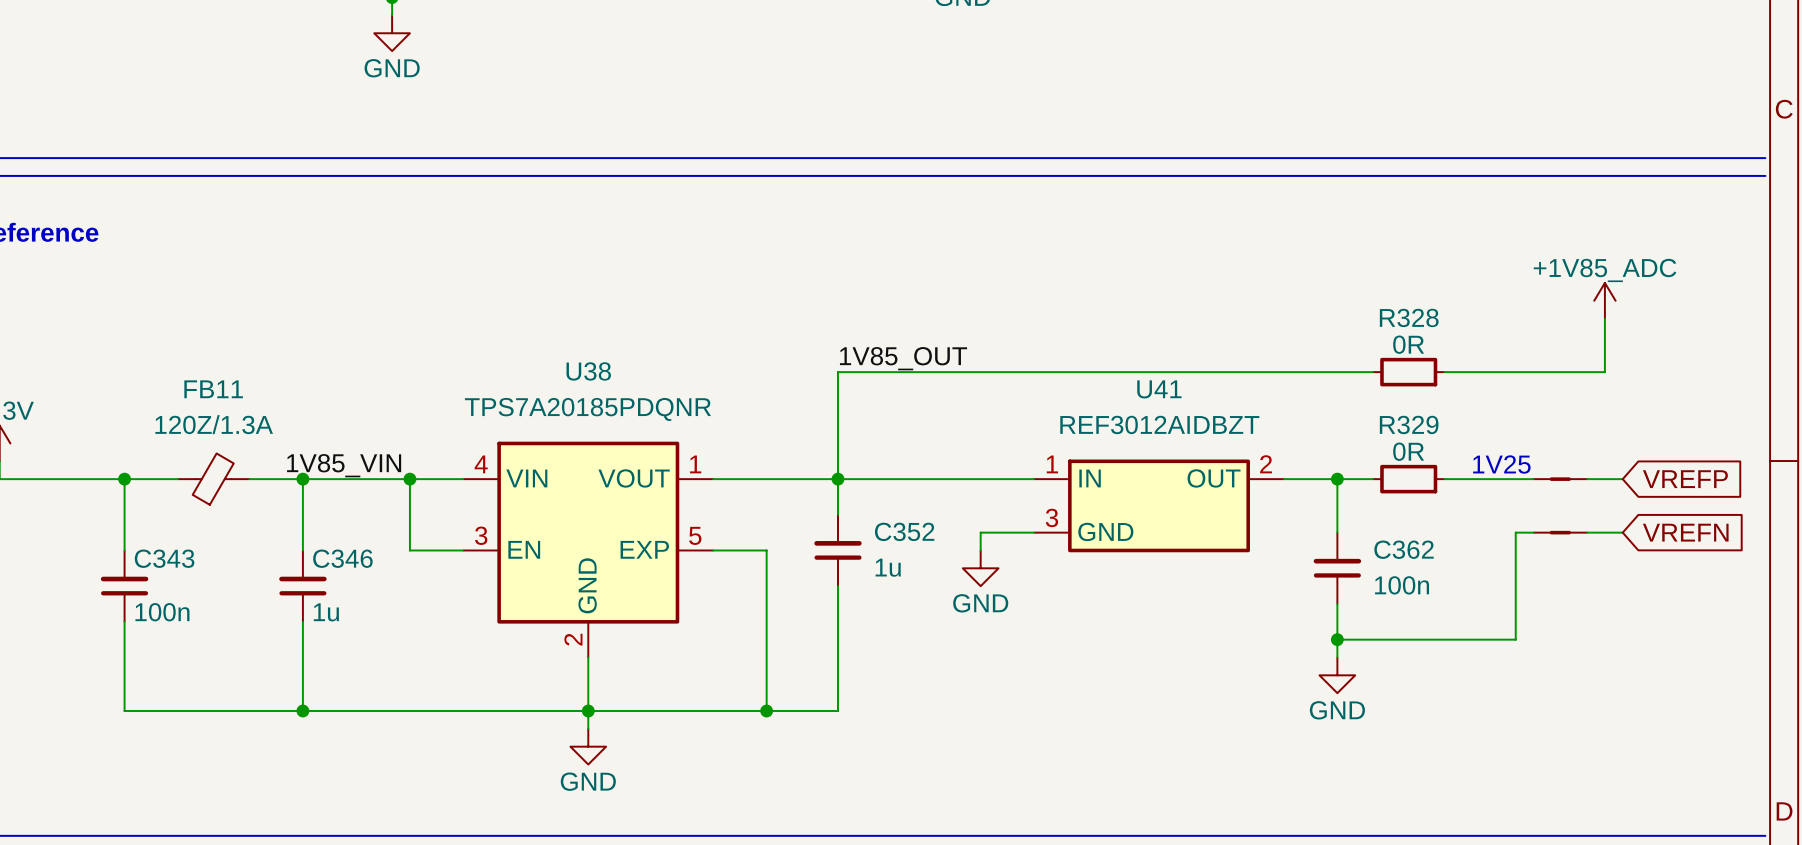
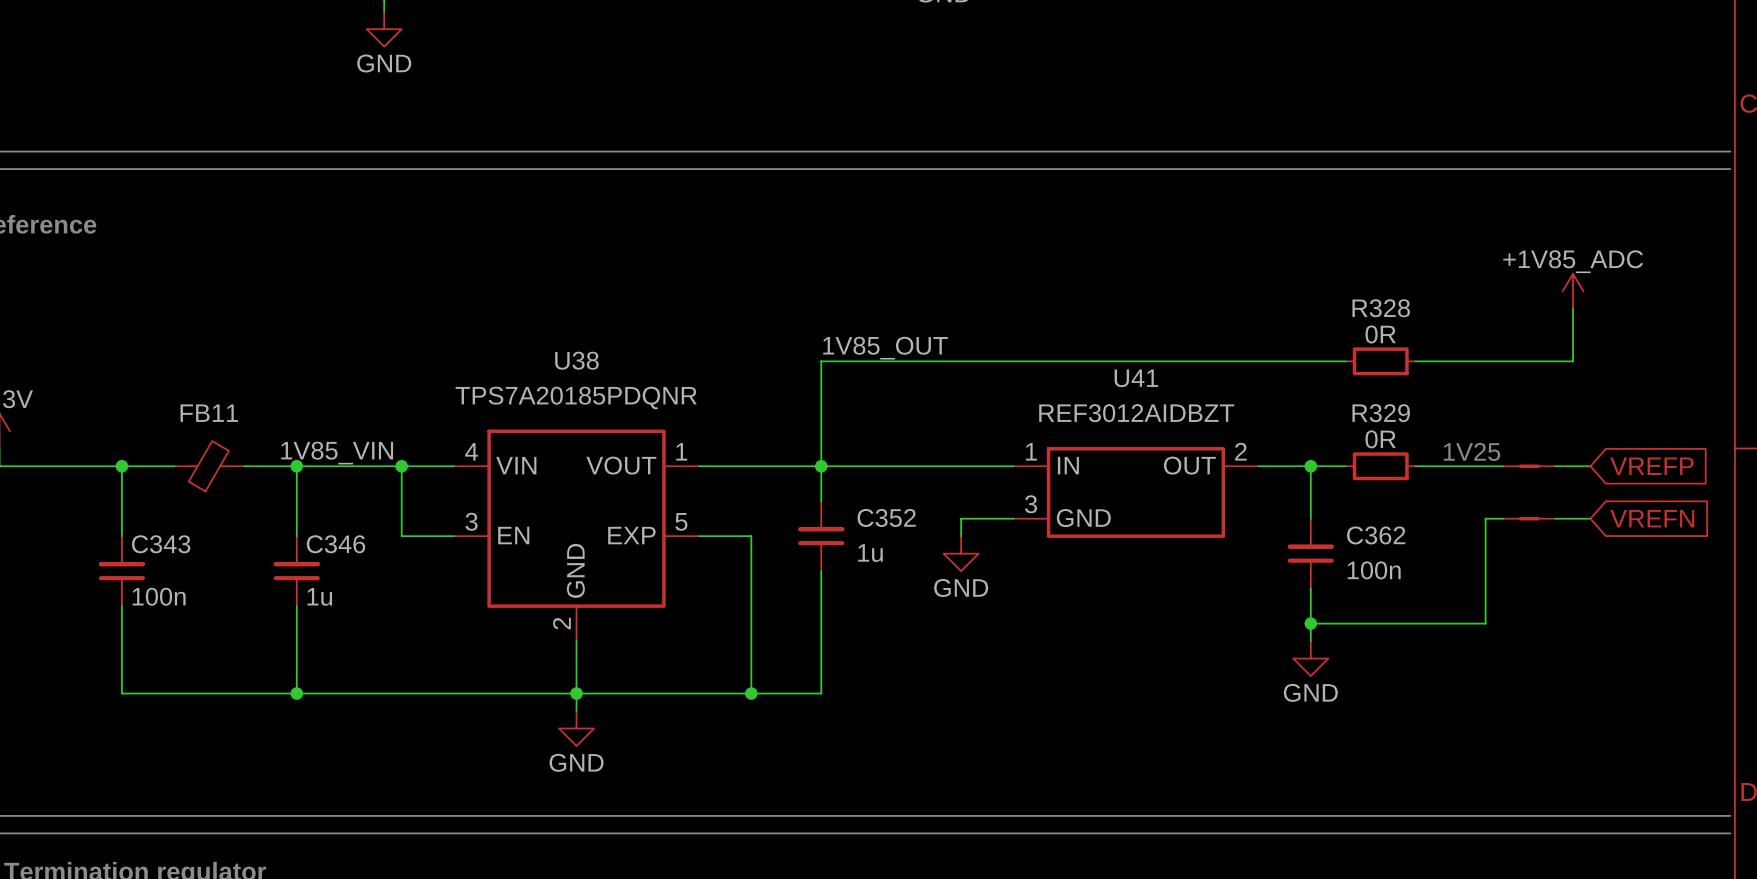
FB11 name position: FB11 (213, 389) -> FB11 (209, 413)
FB11 text: 120Z/1.3A (214, 424) -> none

